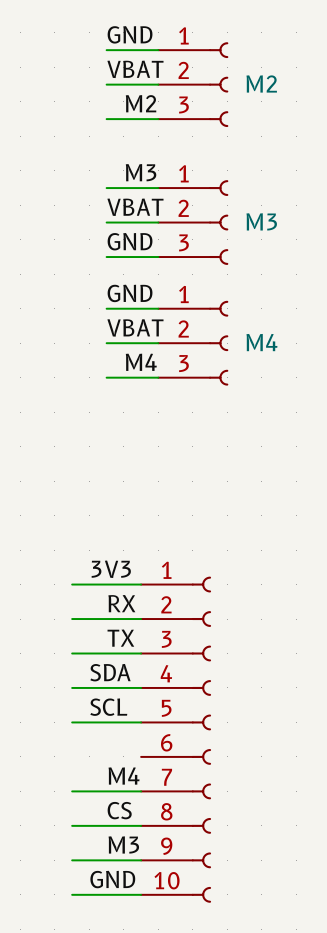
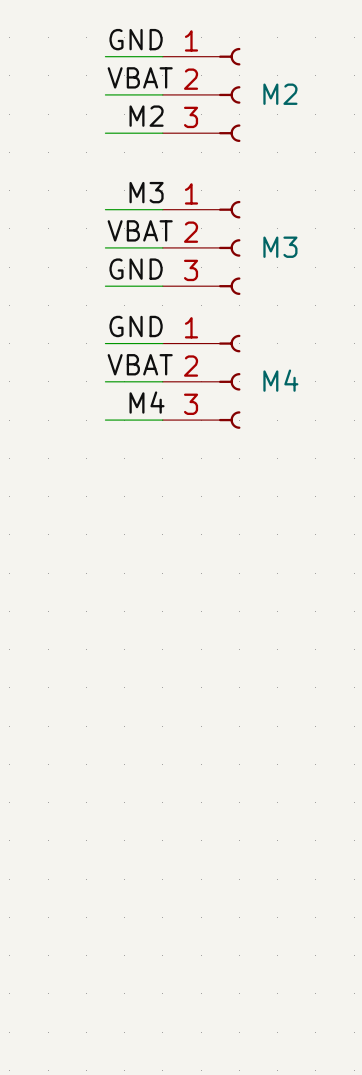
label: 3V3 (111, 569) -> none
wire: (72, 584) (141, 584) -> none
label: RX (121, 603) -> none
wire: (72, 619) (141, 619) -> none
label: TX (120, 638) -> none
wire: (72, 653) (141, 653) -> none
label: SDA (110, 672) -> none
wire: (72, 687) (141, 687) -> none
label: SCL (108, 707) -> none
wire: (72, 722) (141, 722) -> none
part: (176, 739) -> none
label: M4 (124, 776) -> none
wire: (72, 791) (141, 791) -> none
label: CS (119, 810) -> none
wire: (72, 825) (141, 825) -> none
label: M3 (123, 844) -> none
wire: (72, 860) (141, 860) -> none
label: GND (112, 879) -> none
wire: (72, 894) (141, 894) -> none

